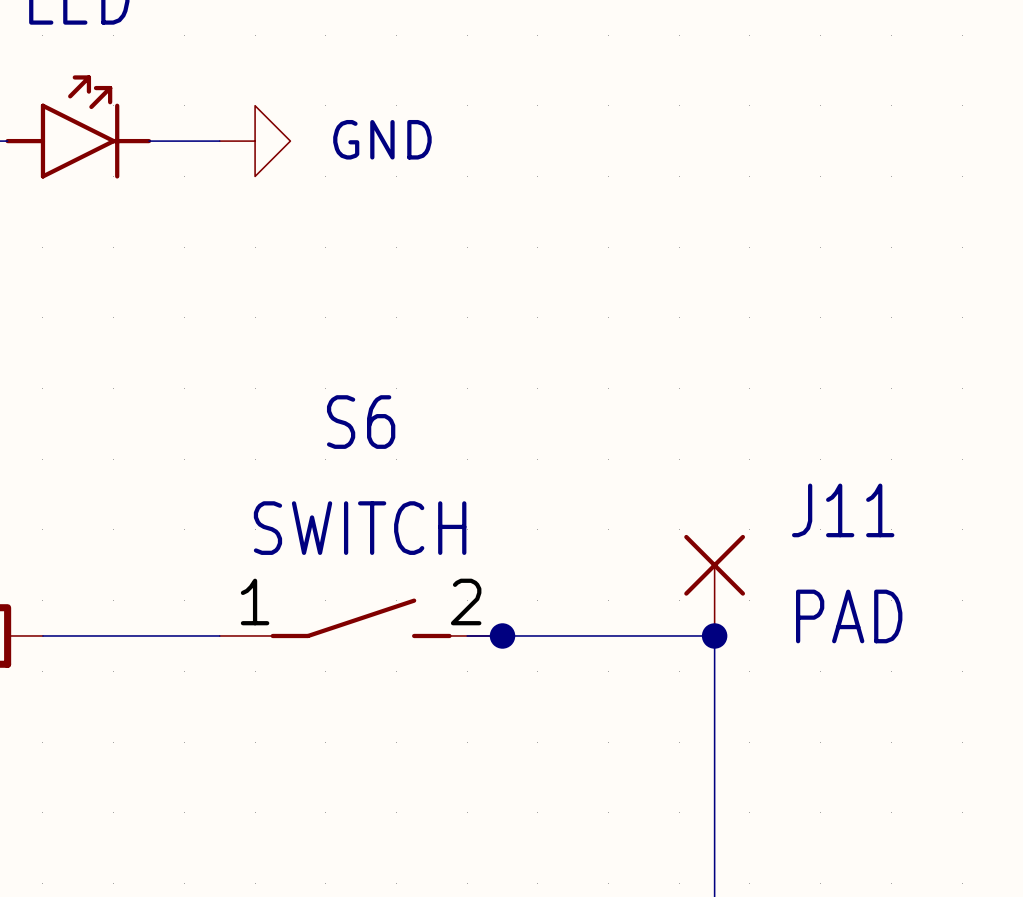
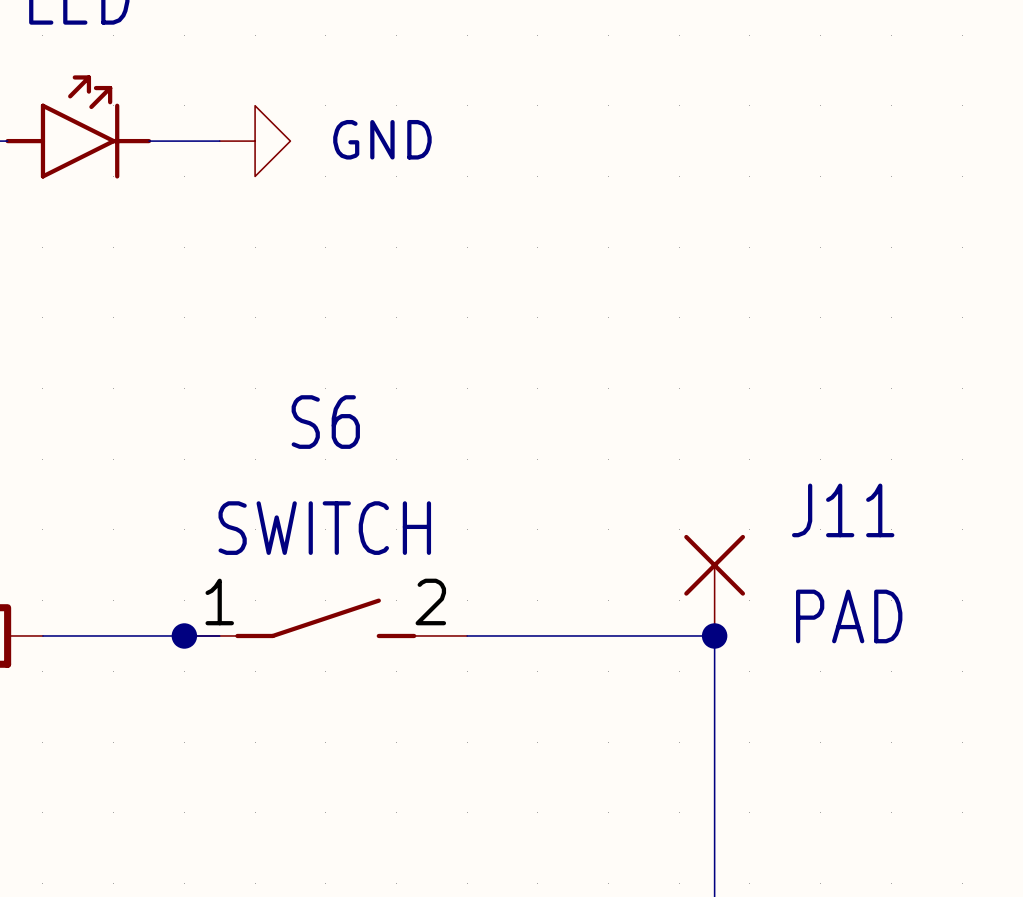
S6 position: (361, 618) -> (325, 618)
junction: none -> (184, 635)
junction: (502, 635) -> none

